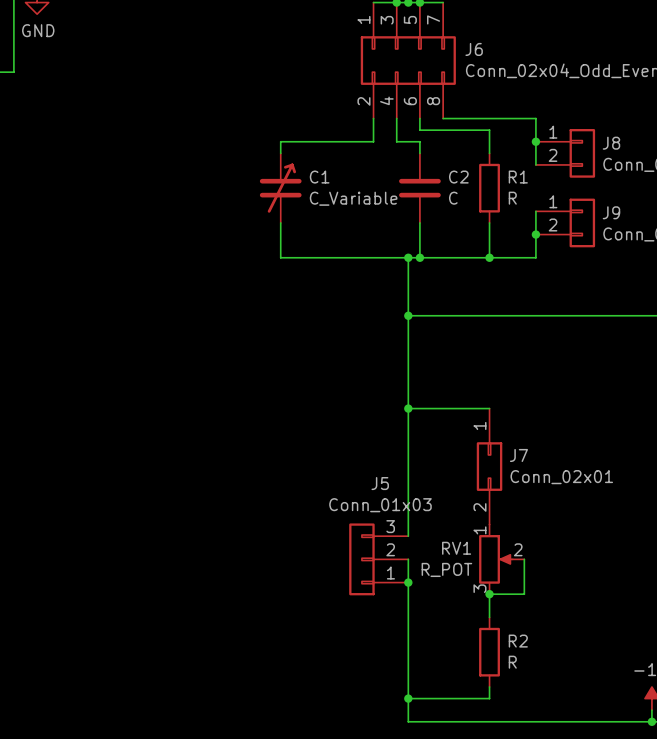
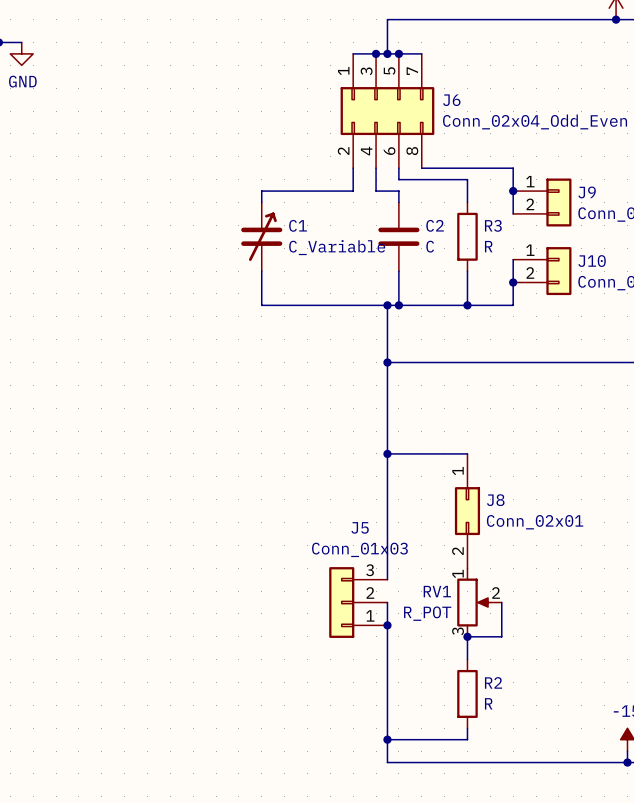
J8 name: J8 (611, 143) -> J9 (587, 192)
R1 name: R1 (518, 177) -> R3 (493, 225)
J9 name: J9 (611, 212) -> J10 (592, 261)
J7 name: J7 (518, 455) -> J8 (495, 500)

